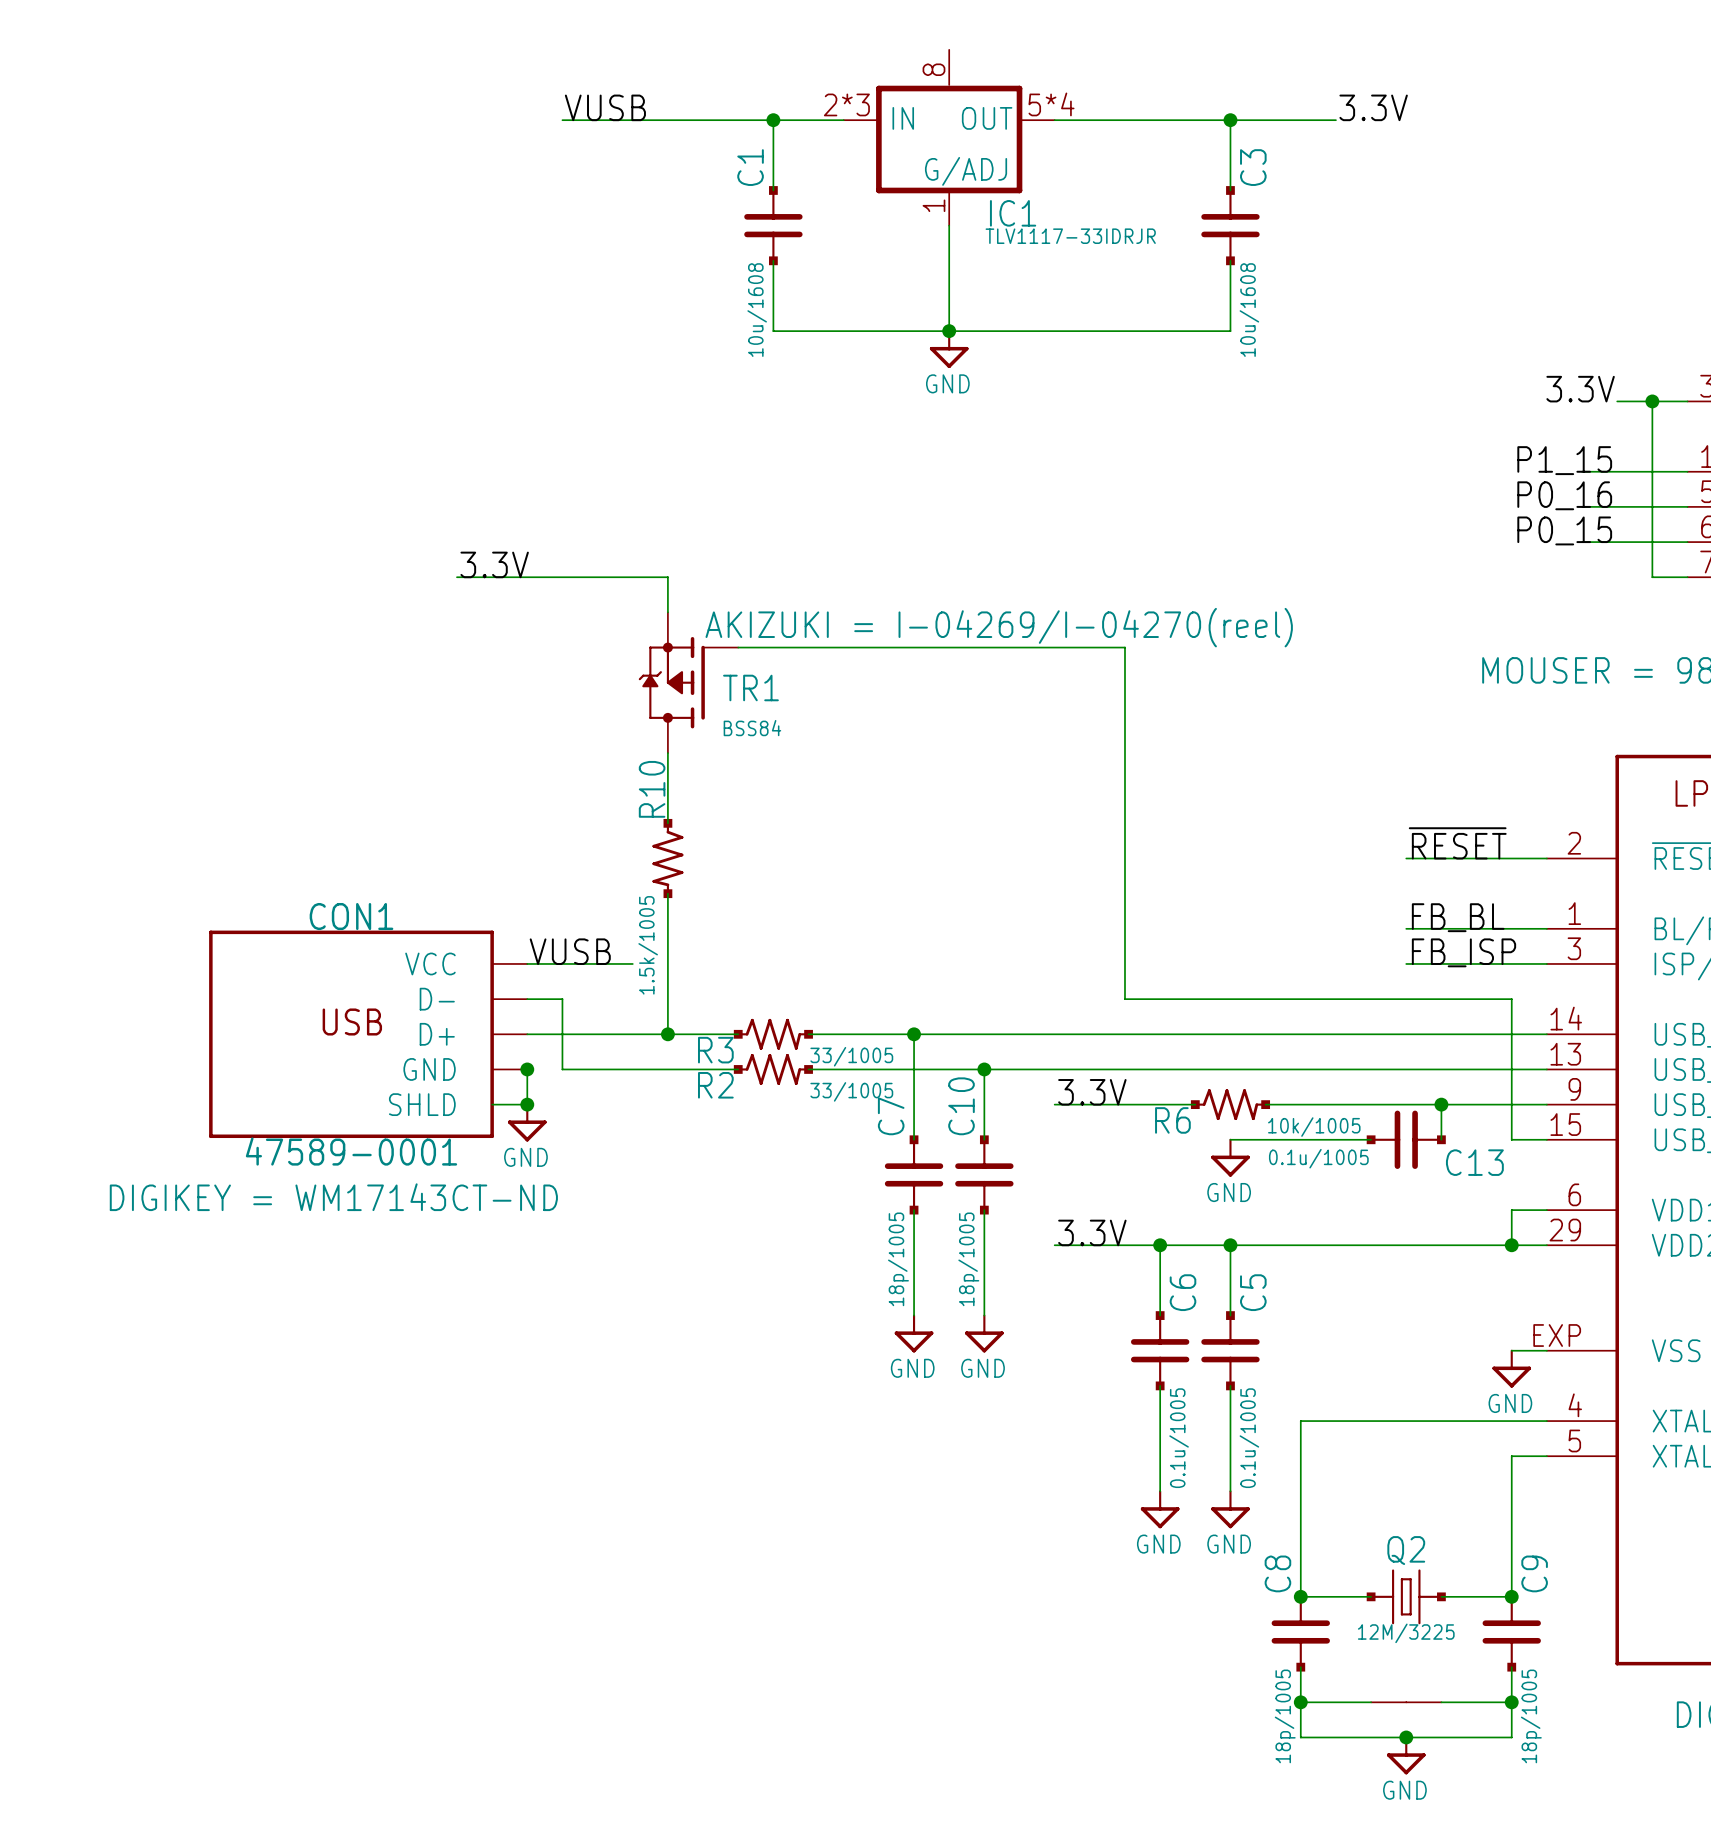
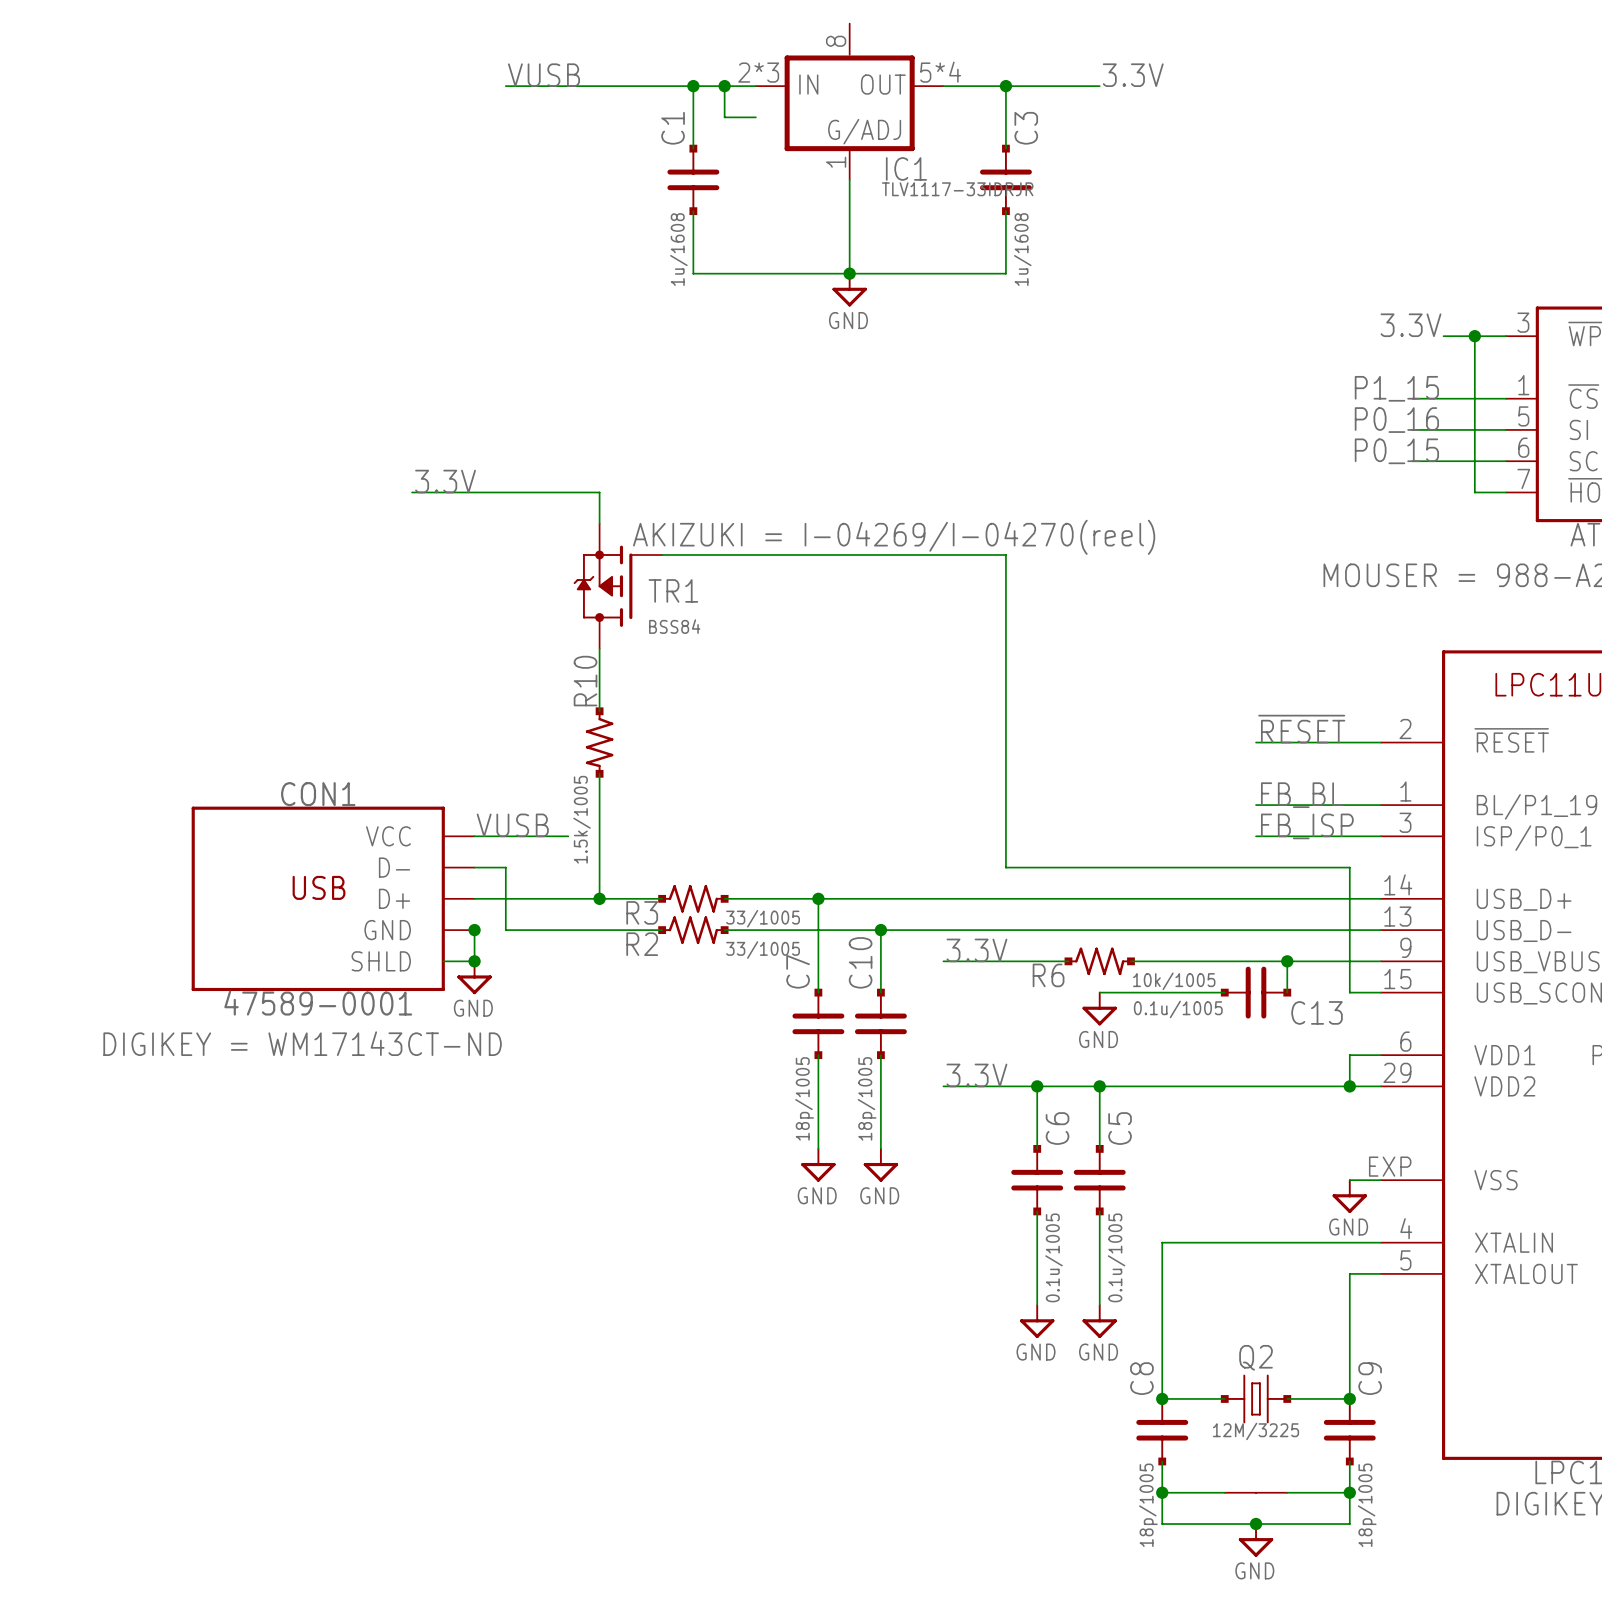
label position: 3.3V (1373, 107) -> 3.3V (1133, 75)
wire: none -> (724, 86) (724, 117) (755, 117)
junction: none -> (724, 86)
wire: none -> (1005, 86) (1005, 148)
junction: none -> (1005, 86)
junction: (1230, 120) -> none
wire: (1335, 120) (1230, 120) (1230, 190) -> none
C3 position: (1230, 225) -> (1005, 179)
wire: (1230, 260) (1230, 331) (1124, 331) -> (1005, 211) (1005, 273)
C1 value: 10u/1608 (757, 310) -> 1u/1608 (678, 249)
C3 value: 10u/1608 (1249, 310) -> 1u/1608 (1022, 249)

